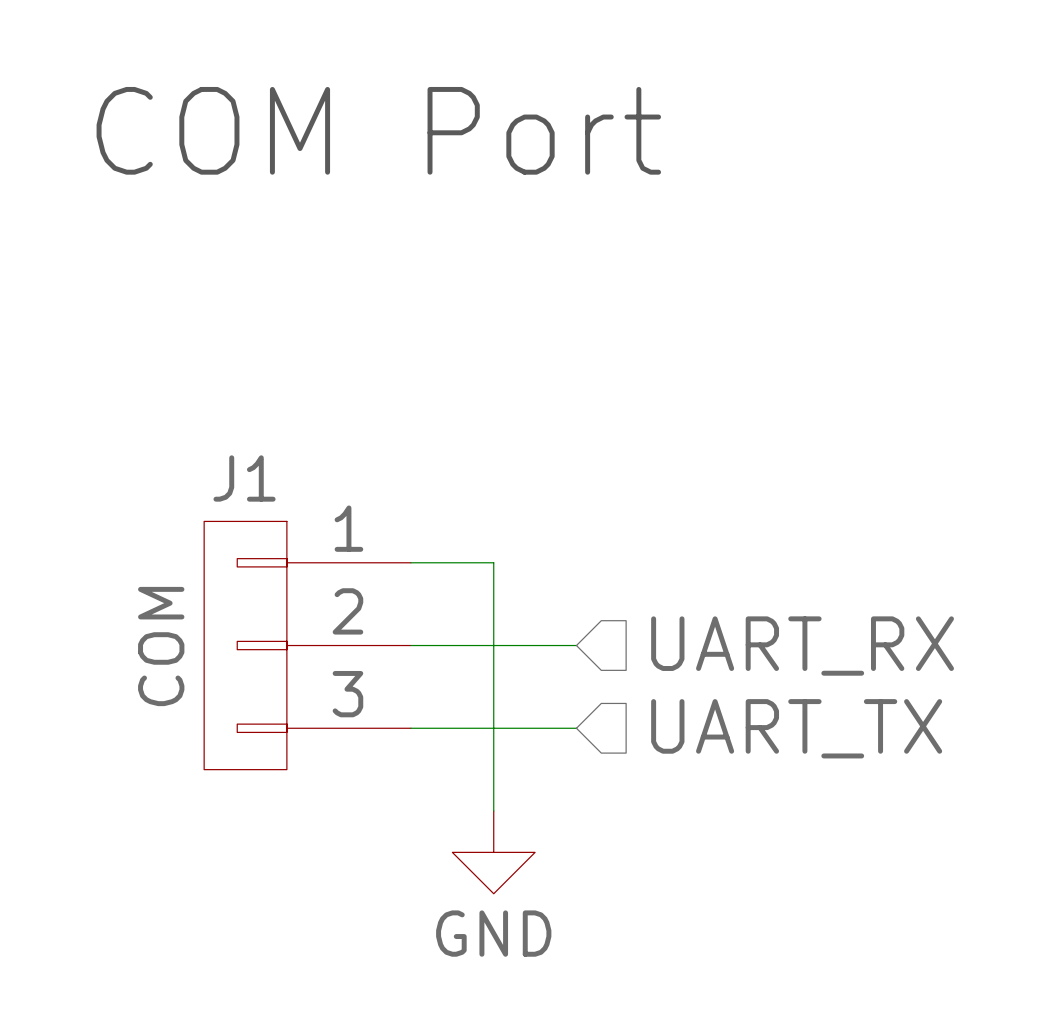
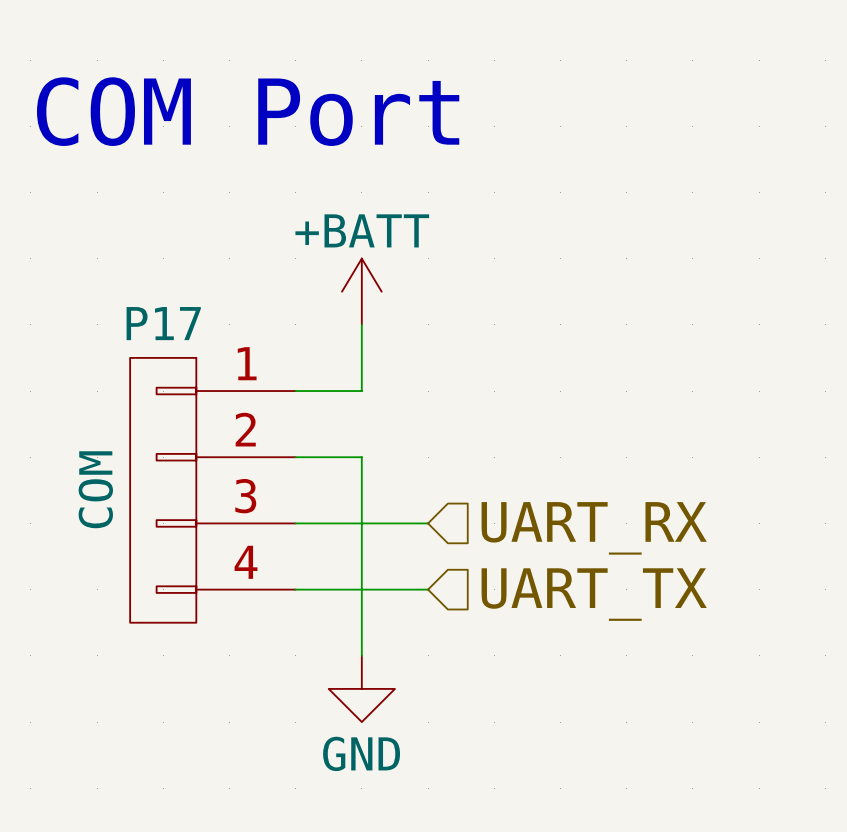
power symbol: none -> +BATT (361, 291)
wire: none -> (361, 324) (361, 391) (295, 391)
P17: none -> COM (212, 490)
J1: COM (307, 645) -> none

